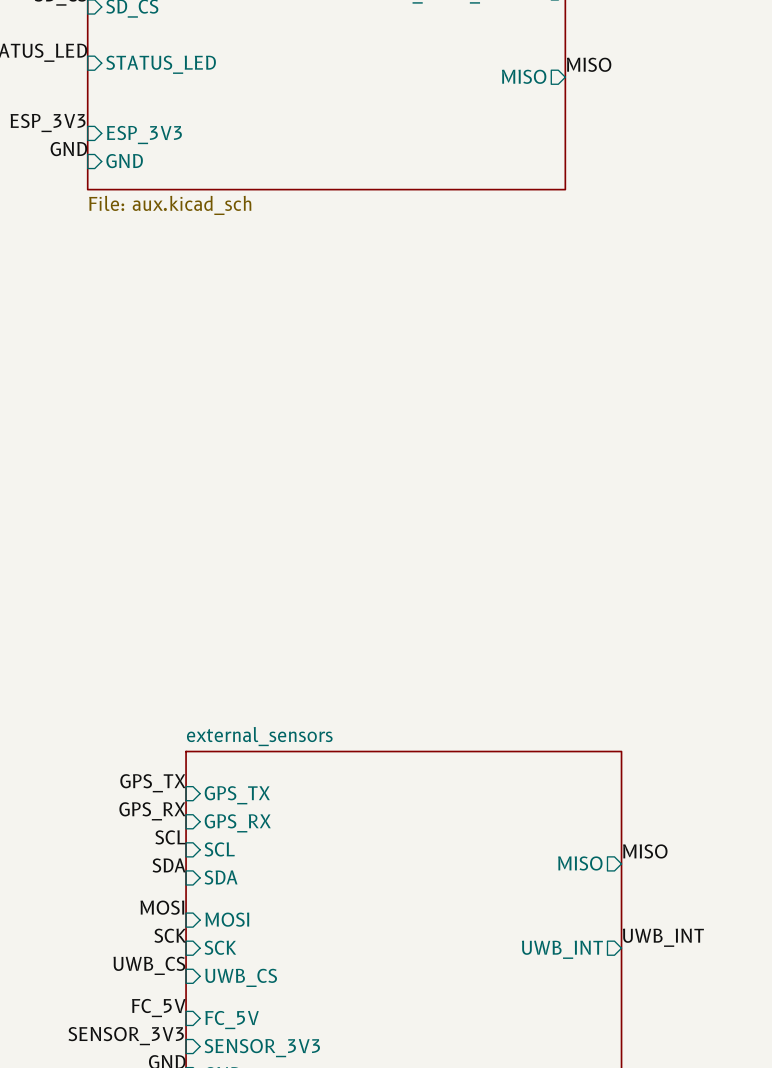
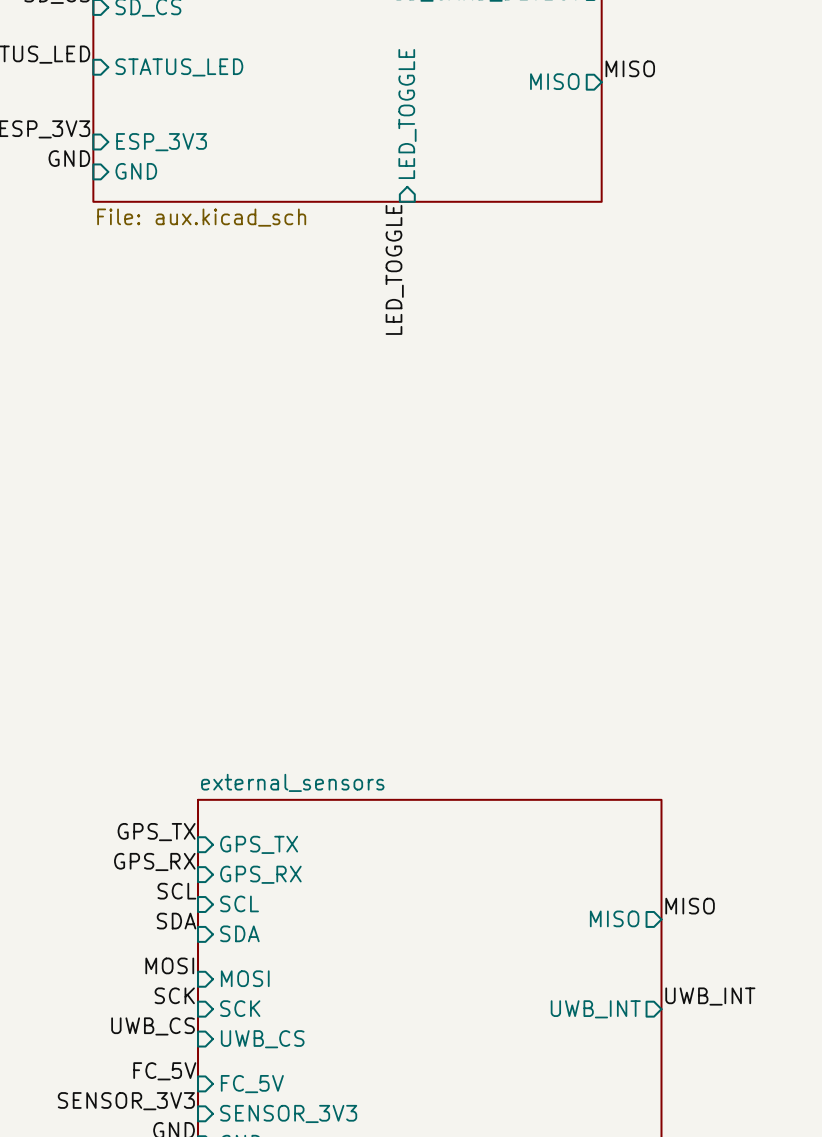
sheet pin: none -> LED_TOGGLE (407, 114)
label: none -> LED_TOGGLE (394, 269)

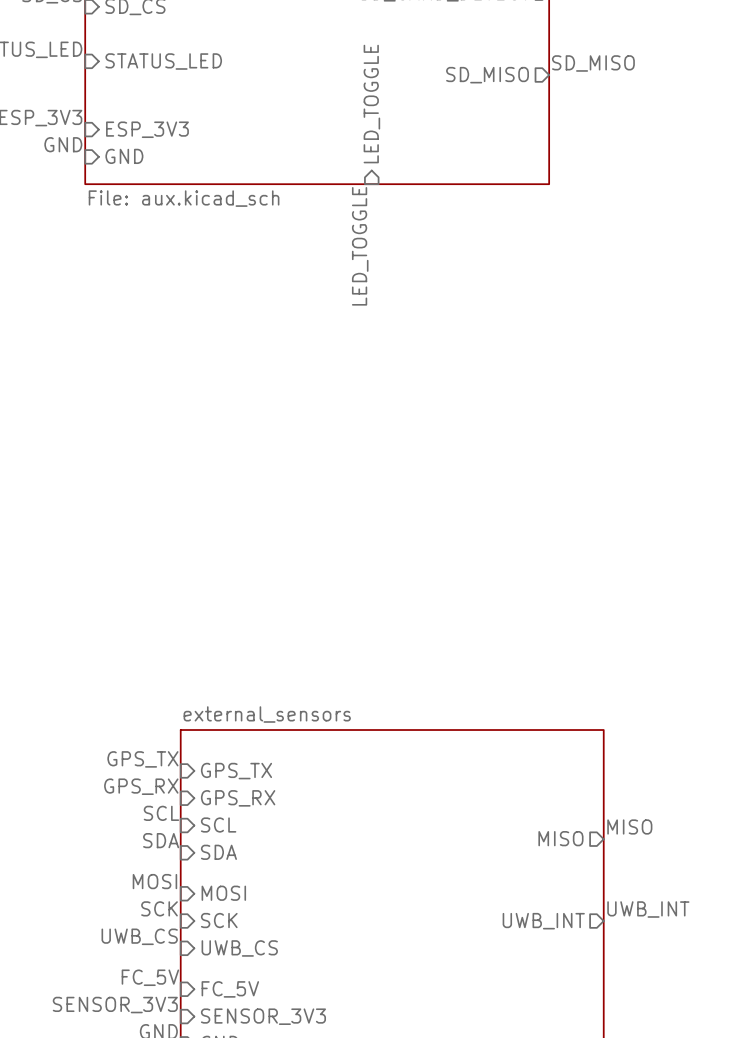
label: MISO (630, 68) -> SD_MISO (593, 63)
sheet pin: MISO (554, 81) -> SD_MISO (487, 75)

